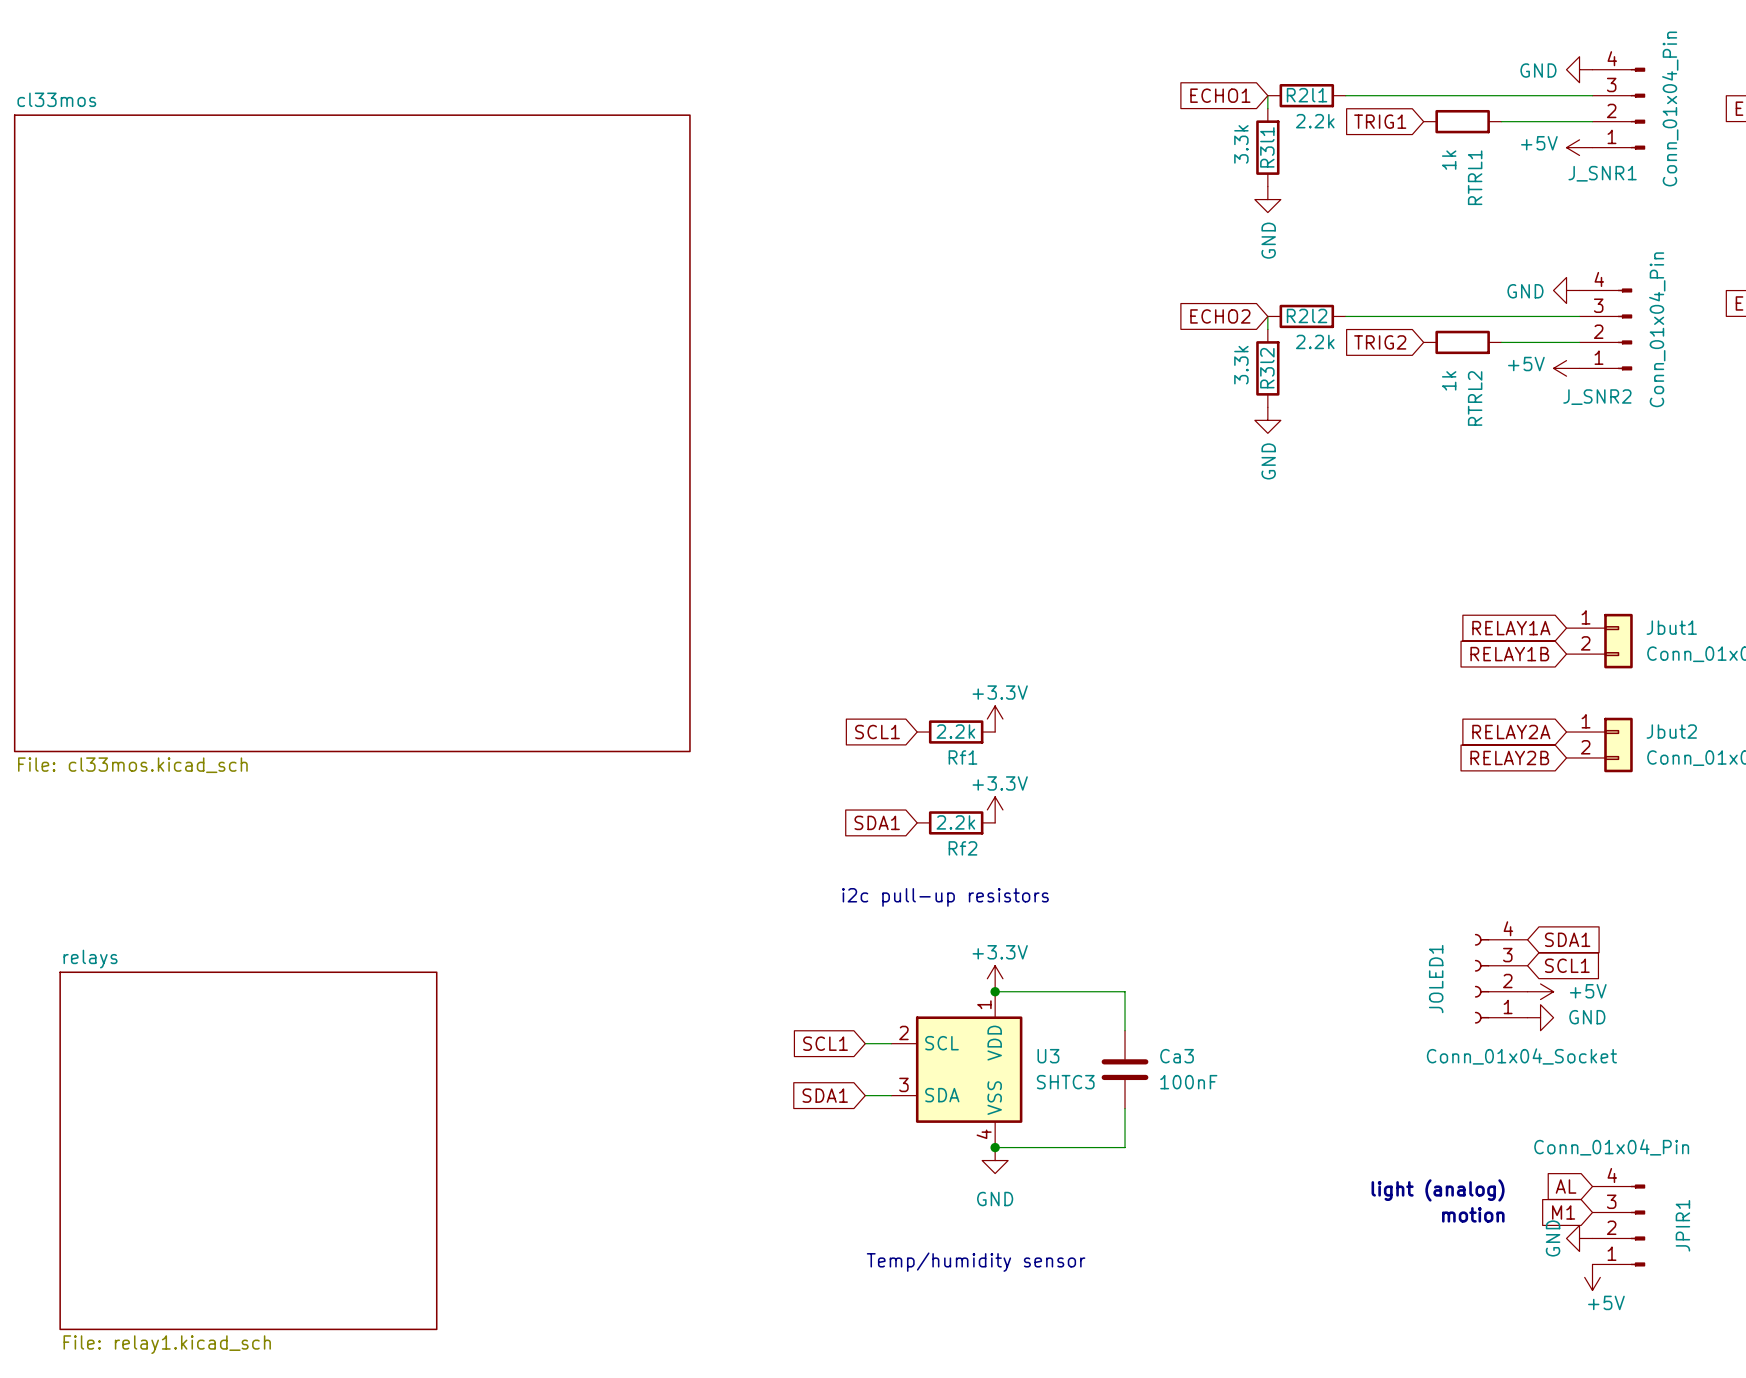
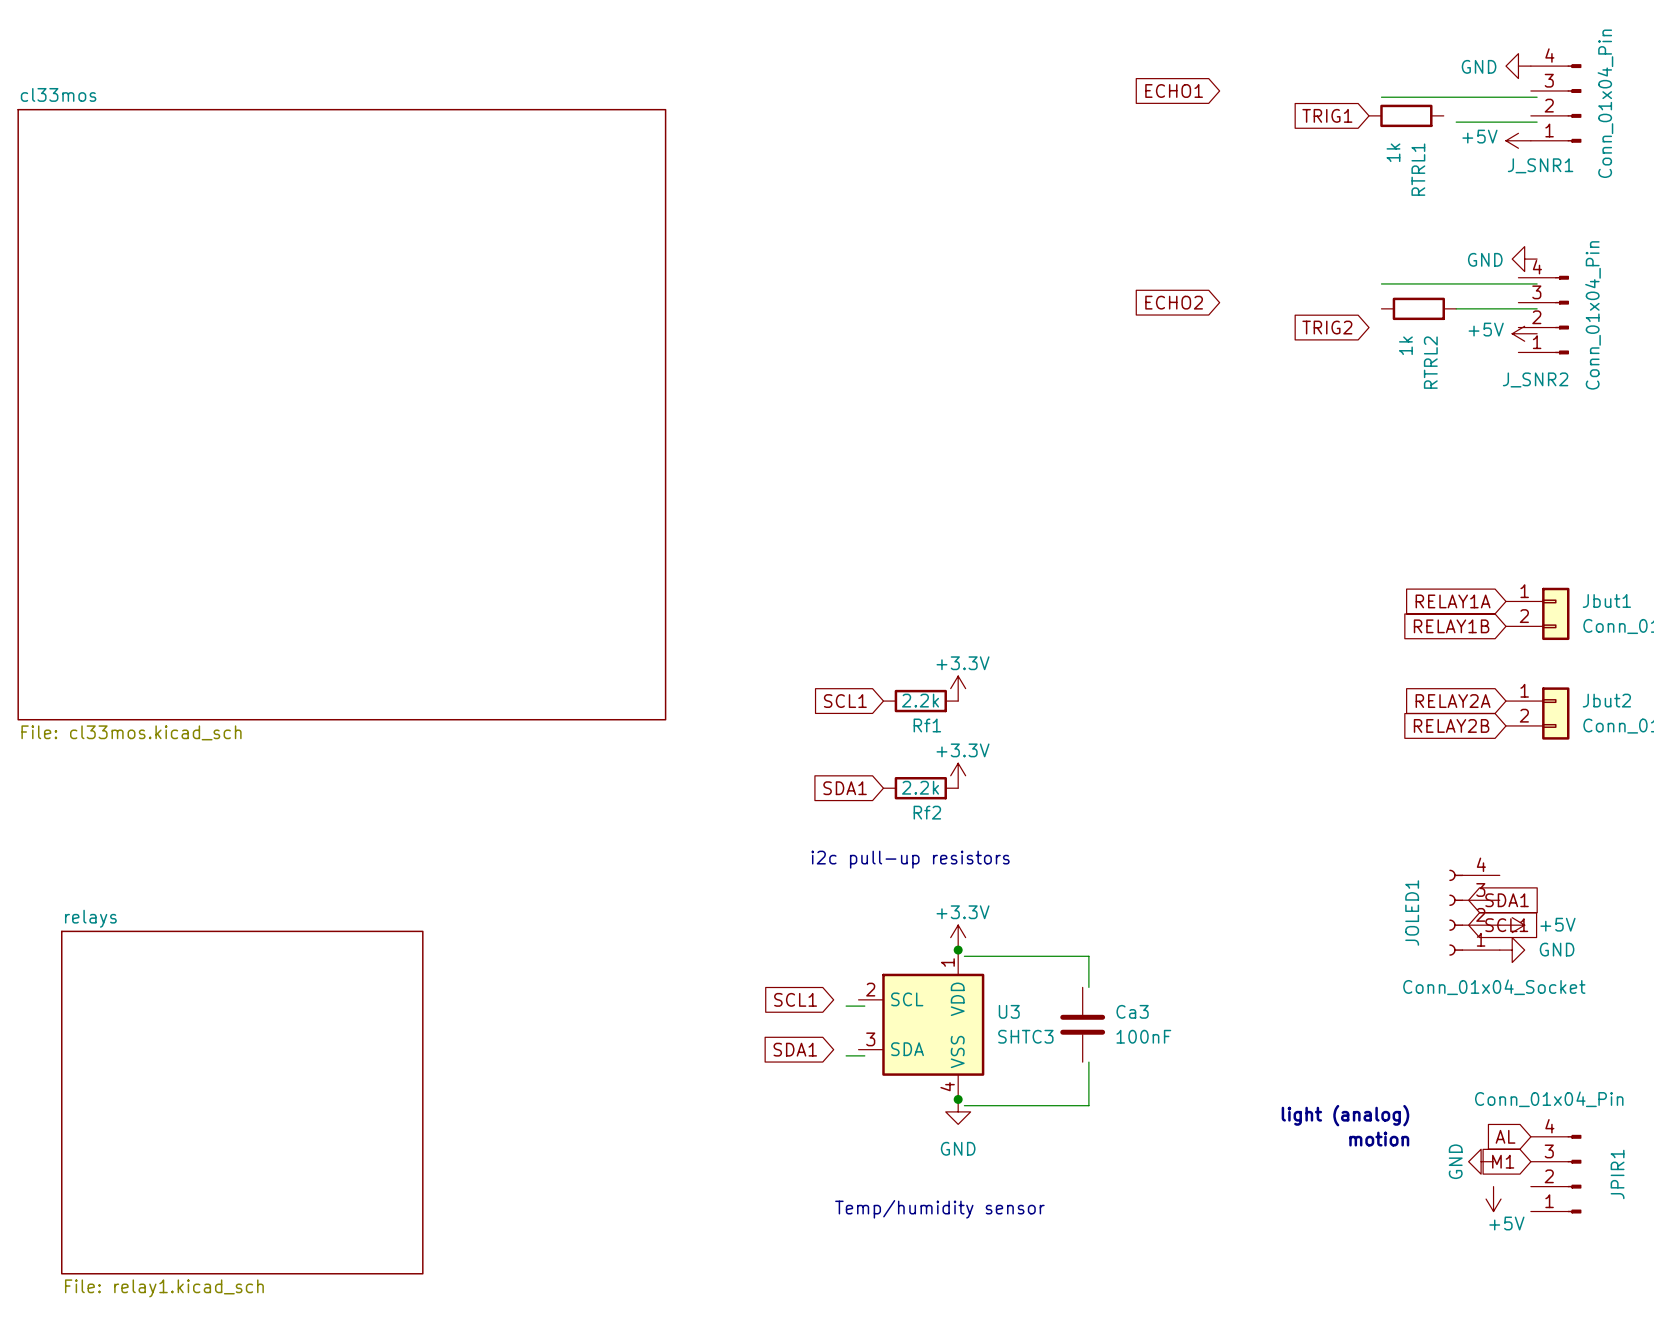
wire: (1267, 95) (1267, 108) -> none
R2l1: 2.2k (1306, 95) -> none
wire: (1345, 95) (1592, 95) -> none
wire: none -> (1381, 97) (1537, 97)
wire: (1501, 121) (1592, 121) -> none
wire: none -> (1456, 122) (1537, 122)
R3l1: 3.3k (1267, 147) -> none
power symbol: GND (1267, 199) -> none
power symbol position: GND (1566, 290) -> GND (1524, 259)
wire: none -> (1381, 283) (1537, 283)
wire: (1267, 316) (1267, 329) -> none
R2l2: 2.2k (1306, 316) -> none
wire: (1345, 316) (1579, 316) -> none
wire: none -> (1456, 308) (1537, 308)
RTRL2 position: (1462, 342) -> (1418, 308)
wire: (1501, 342) (1579, 342) -> none
R3l2: 3.3k (1267, 368) -> none
power symbol position: +5V (1566, 368) -> +5V (1524, 333)
power symbol: GND (1267, 420) -> none
JOLED1 position: (1501, 978) -> (1474, 912)
wire: (995, 991) (1125, 991) (1125, 1030) -> none
power symbol position: +5V (1540, 991) -> +5V (1512, 925)
wire: none -> (964, 956) (1088, 956) (1088, 987)
power symbol position: GND (1540, 1017) -> GND (1512, 950)
wire: (865, 1043) (891, 1043) -> none
wire: none -> (846, 1006) (864, 1006)
wire: (865, 1095) (891, 1095) -> none
wire: none -> (846, 1055) (864, 1055)
wire: (1125, 1108) (1125, 1147) (995, 1147) -> none
wire: none -> (1088, 1062) (1088, 1105) (964, 1105)
text position: light (analog) (1438, 1190) -> light (analog) (1345, 1115)
text position: motion (1473, 1214) -> motion (1379, 1139)
power symbol position: GND (1579, 1238) -> GND (1481, 1161)
power symbol position: +5V (1592, 1277) -> +5V (1493, 1199)

